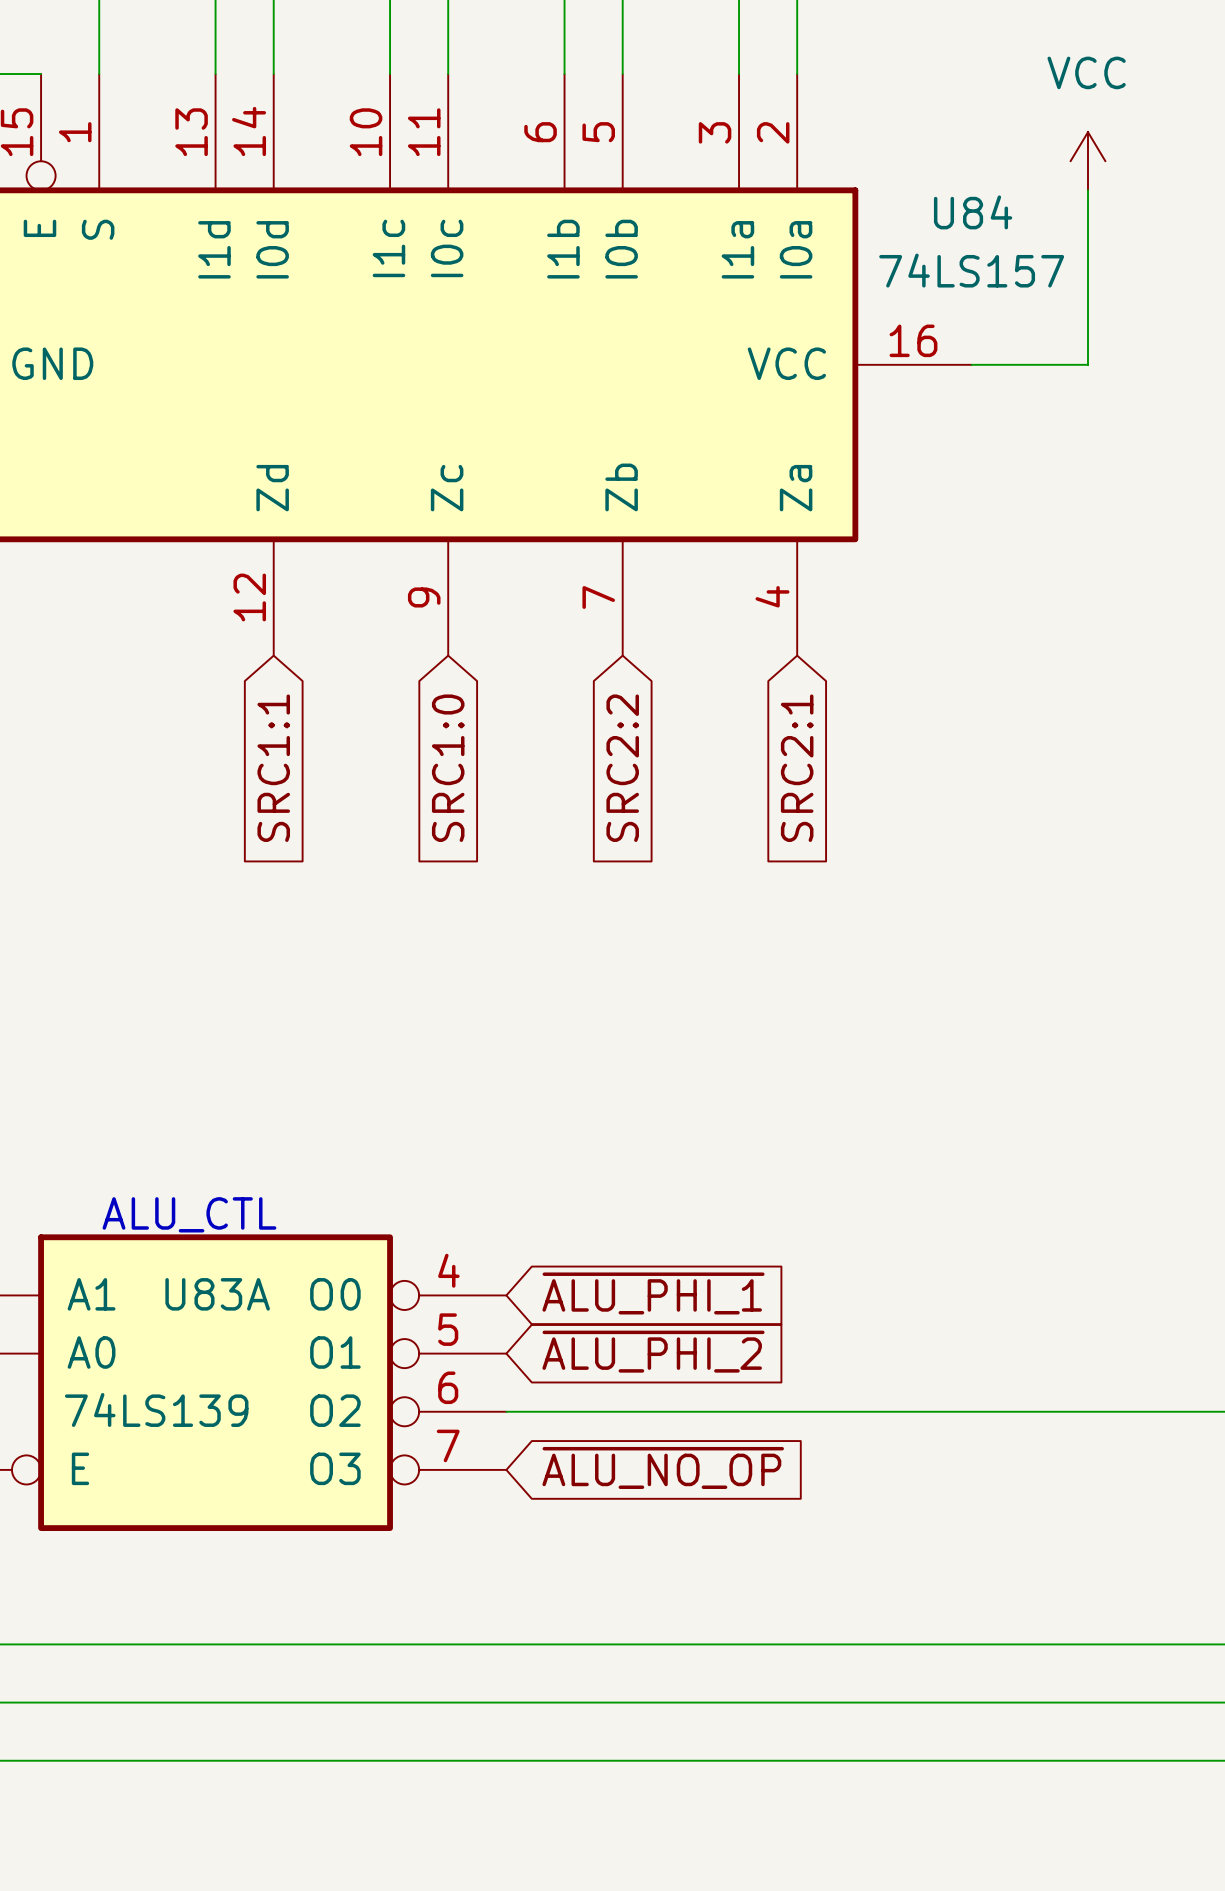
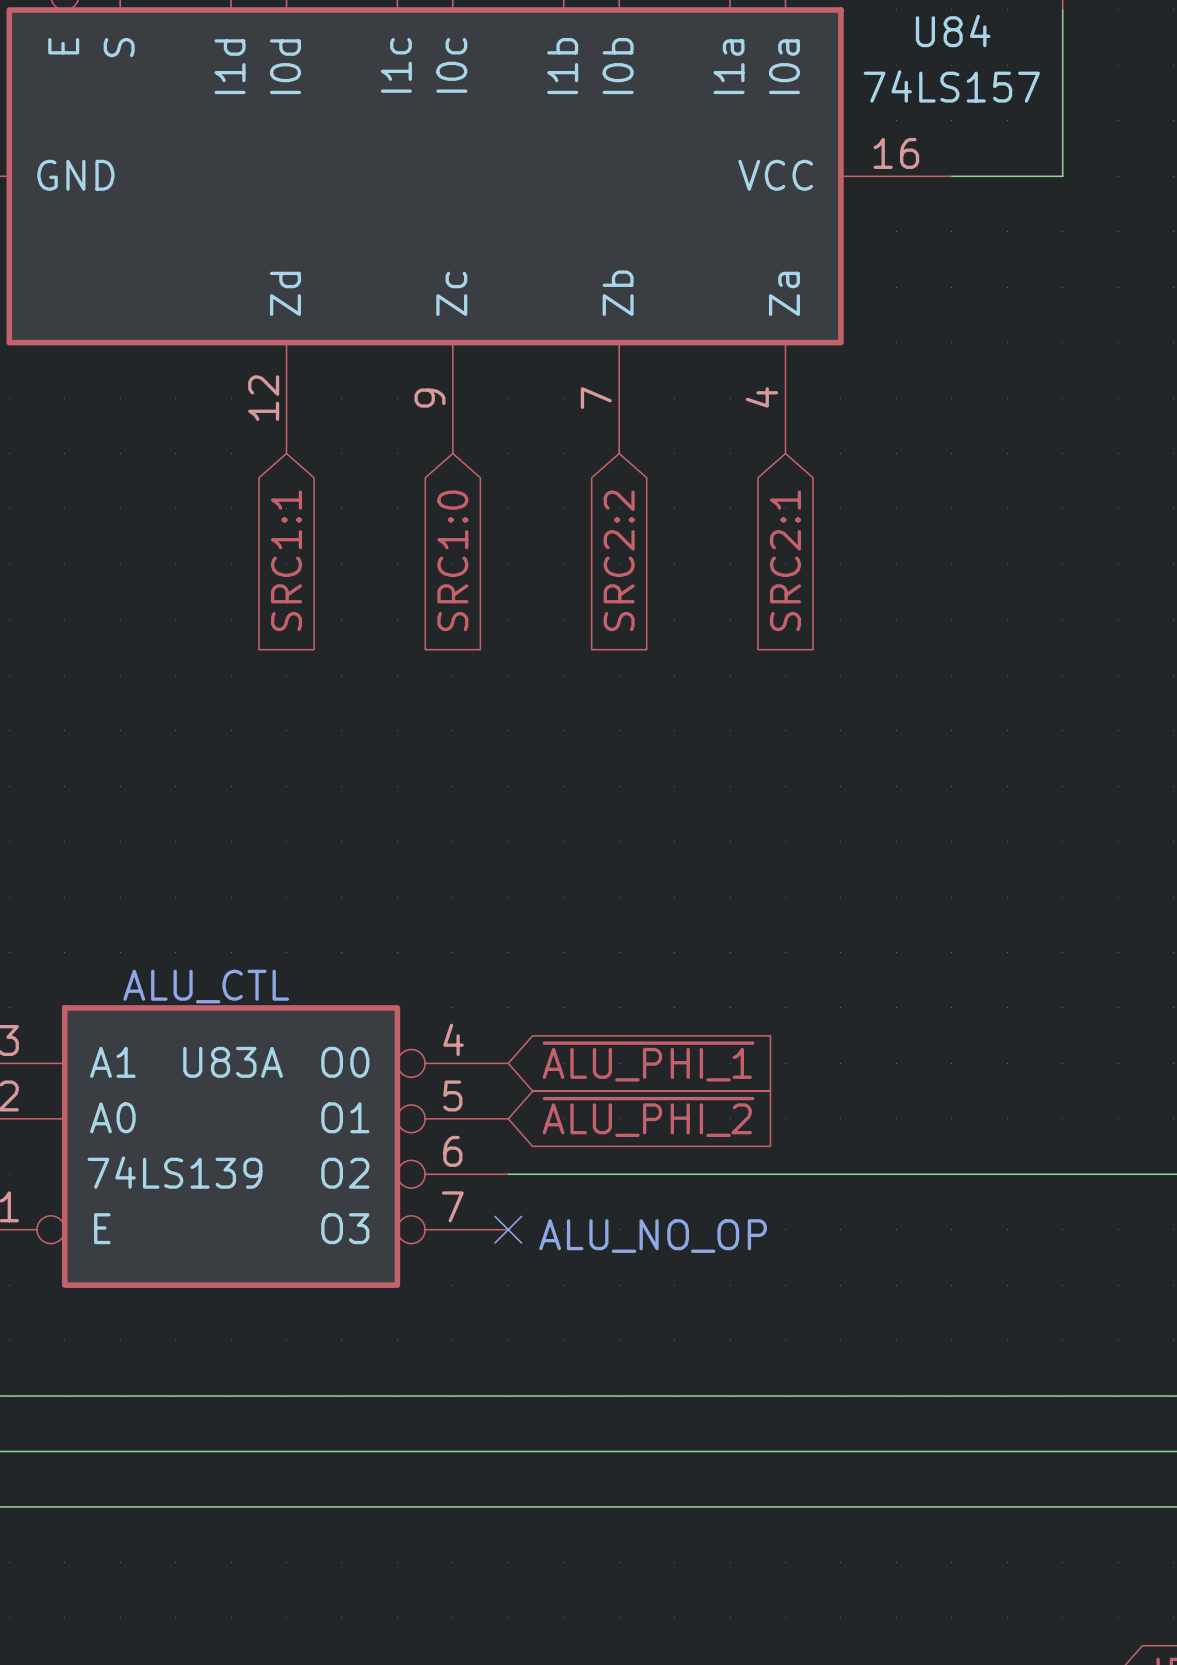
global label: ~{ALU_NO_OP} (663, 1467) -> none
no-connect mark: none -> (508, 1229)
text: none -> ALU_NO_OP (653, 1236)

